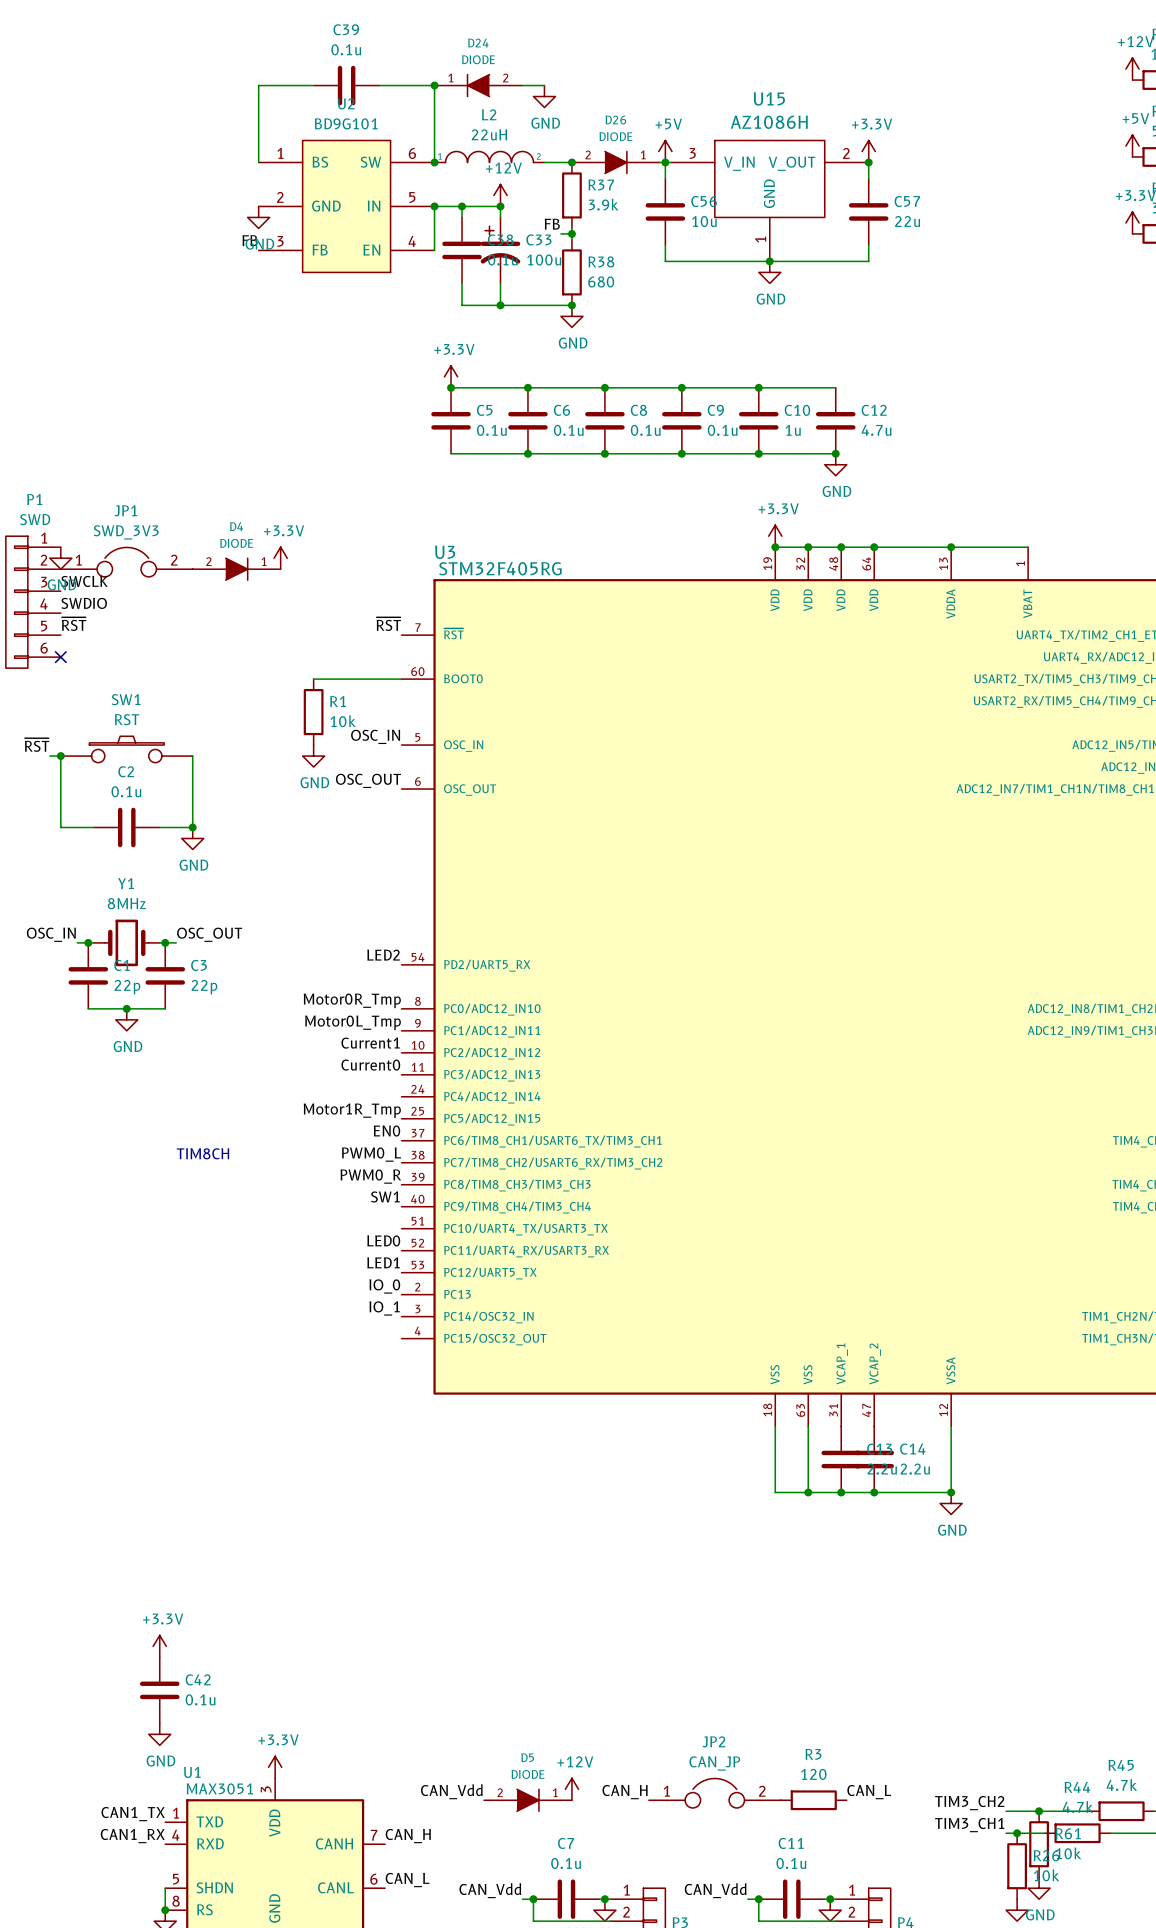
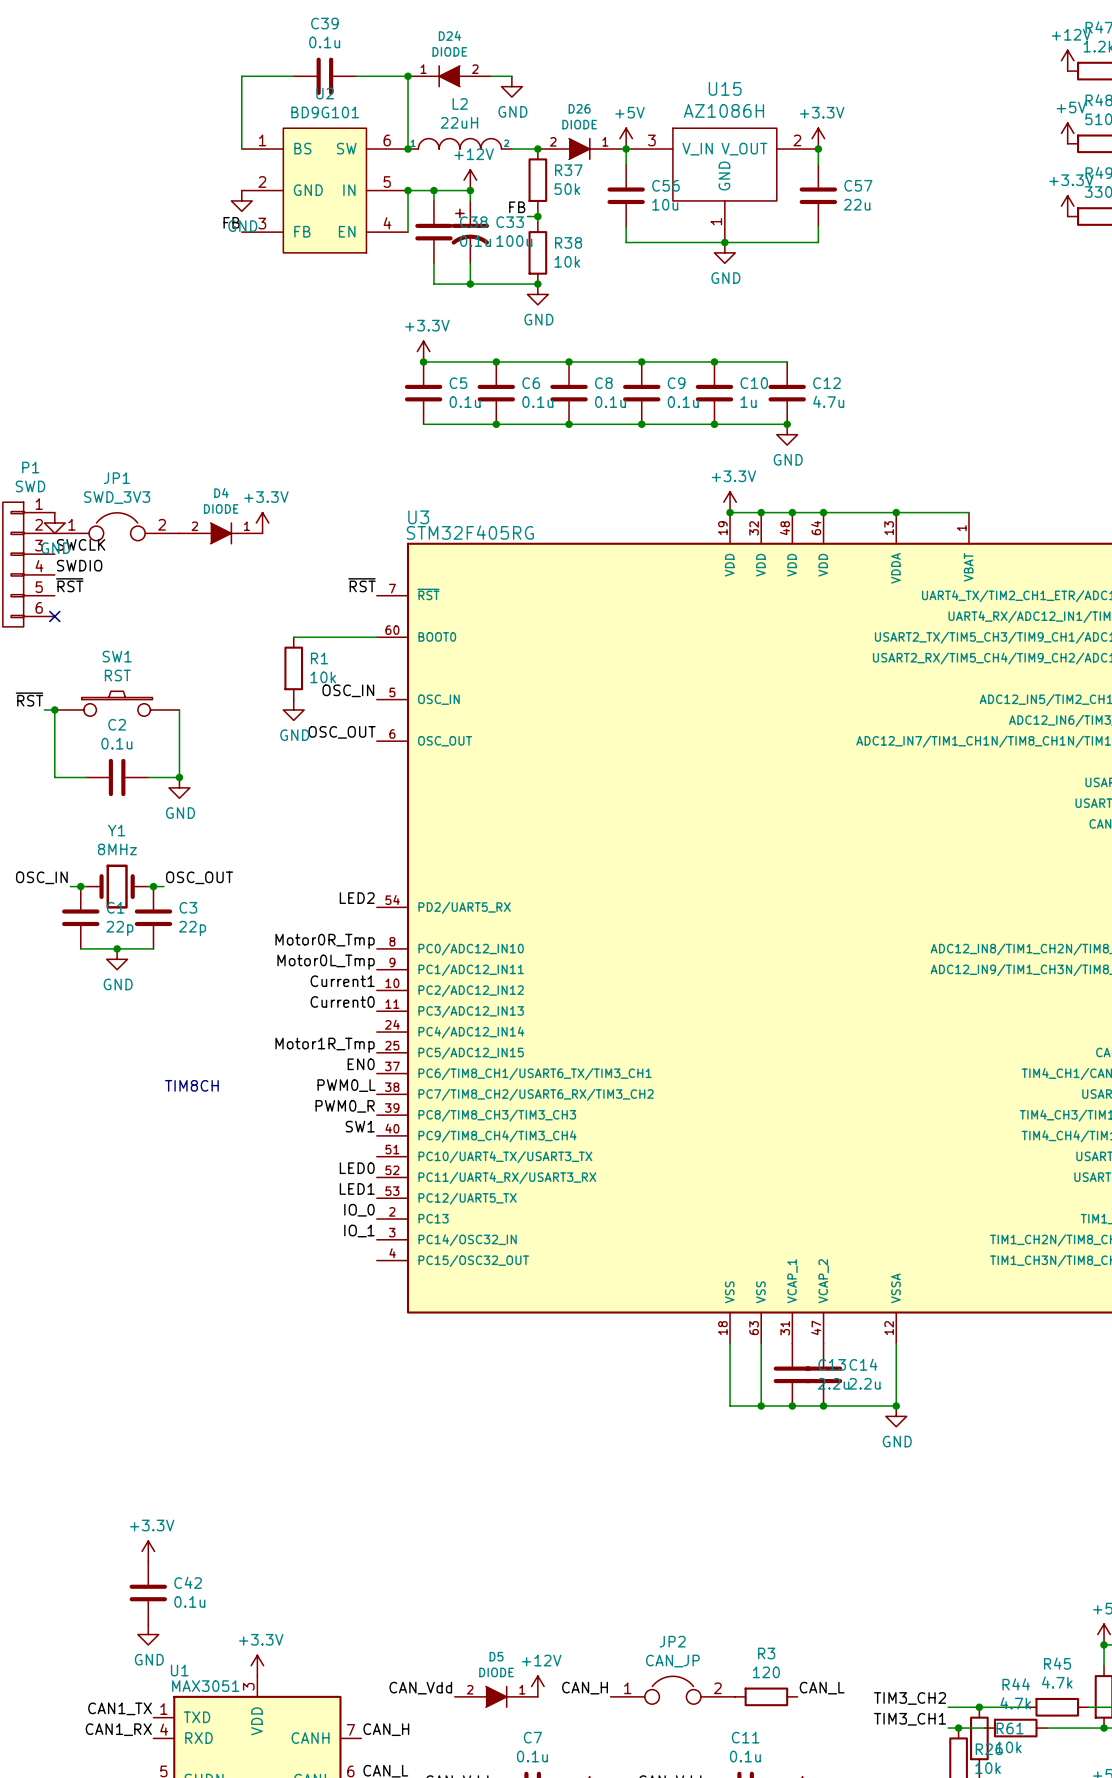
R37 value: 3.9k (603, 204) -> 50k (567, 189)
R38 value: 680 (601, 281) -> 10k (567, 261)

